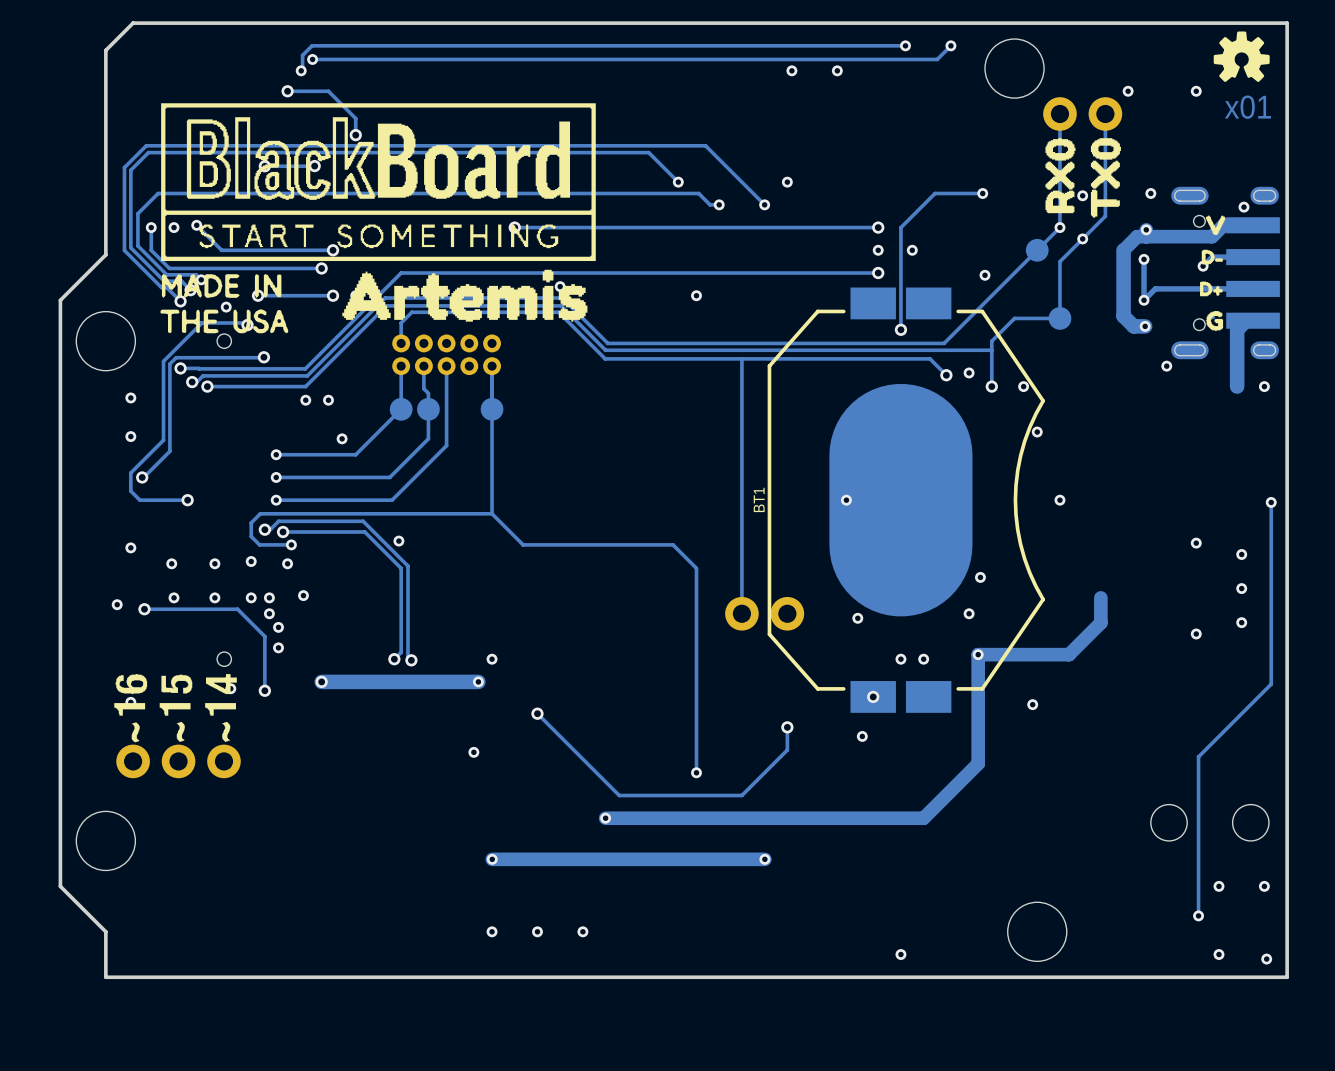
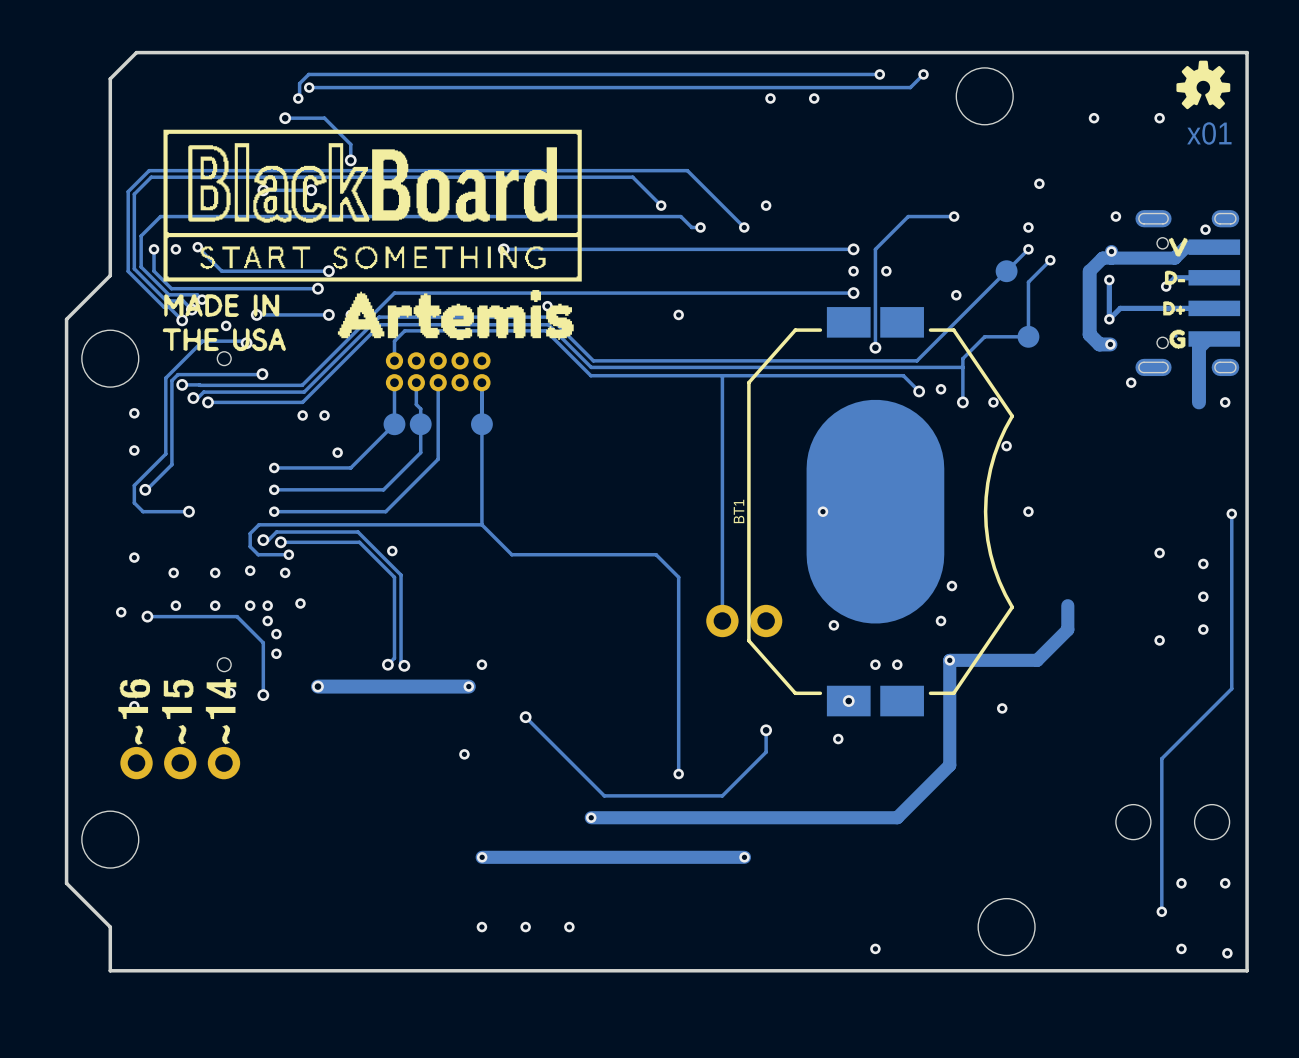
track: (1059, 113) (1059, 227) -> none
part: (1082, 113) -> none
track: (1105, 113) (1105, 216) (1082, 238) -> none
drawing: [1045, 138, 1121, 218] -> none
via: none -> (1039, 183)
via: (1082, 195) -> none
via: none -> (1028, 227)

